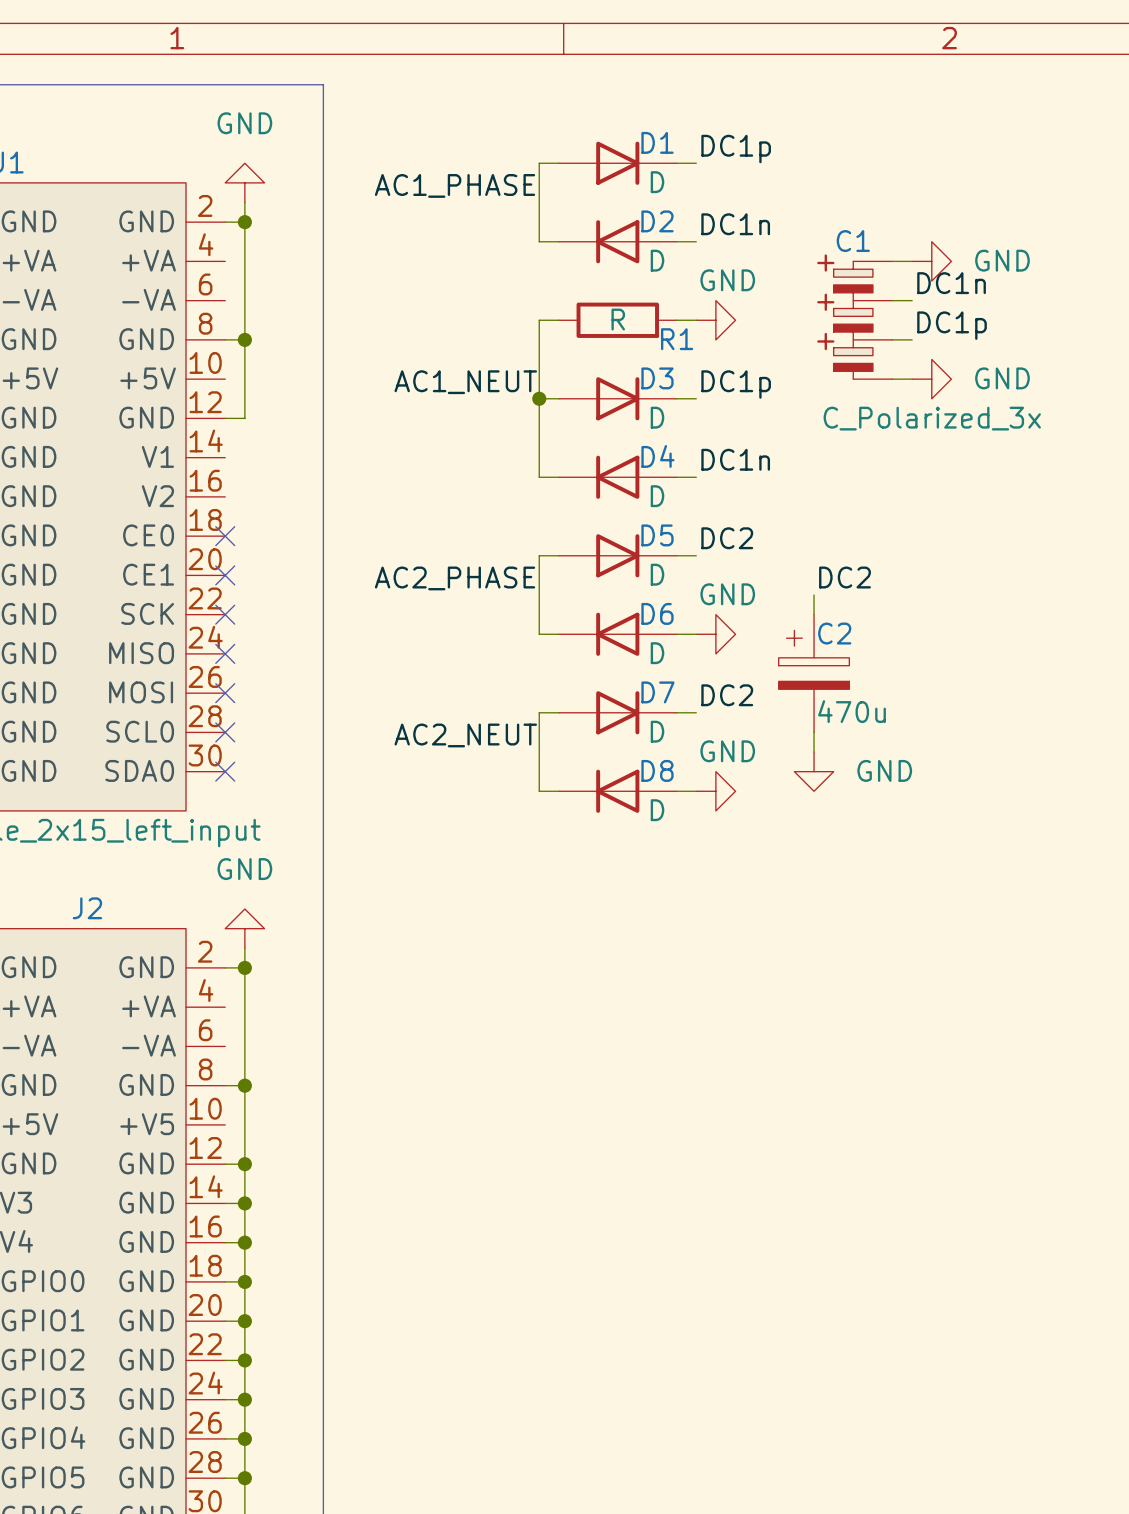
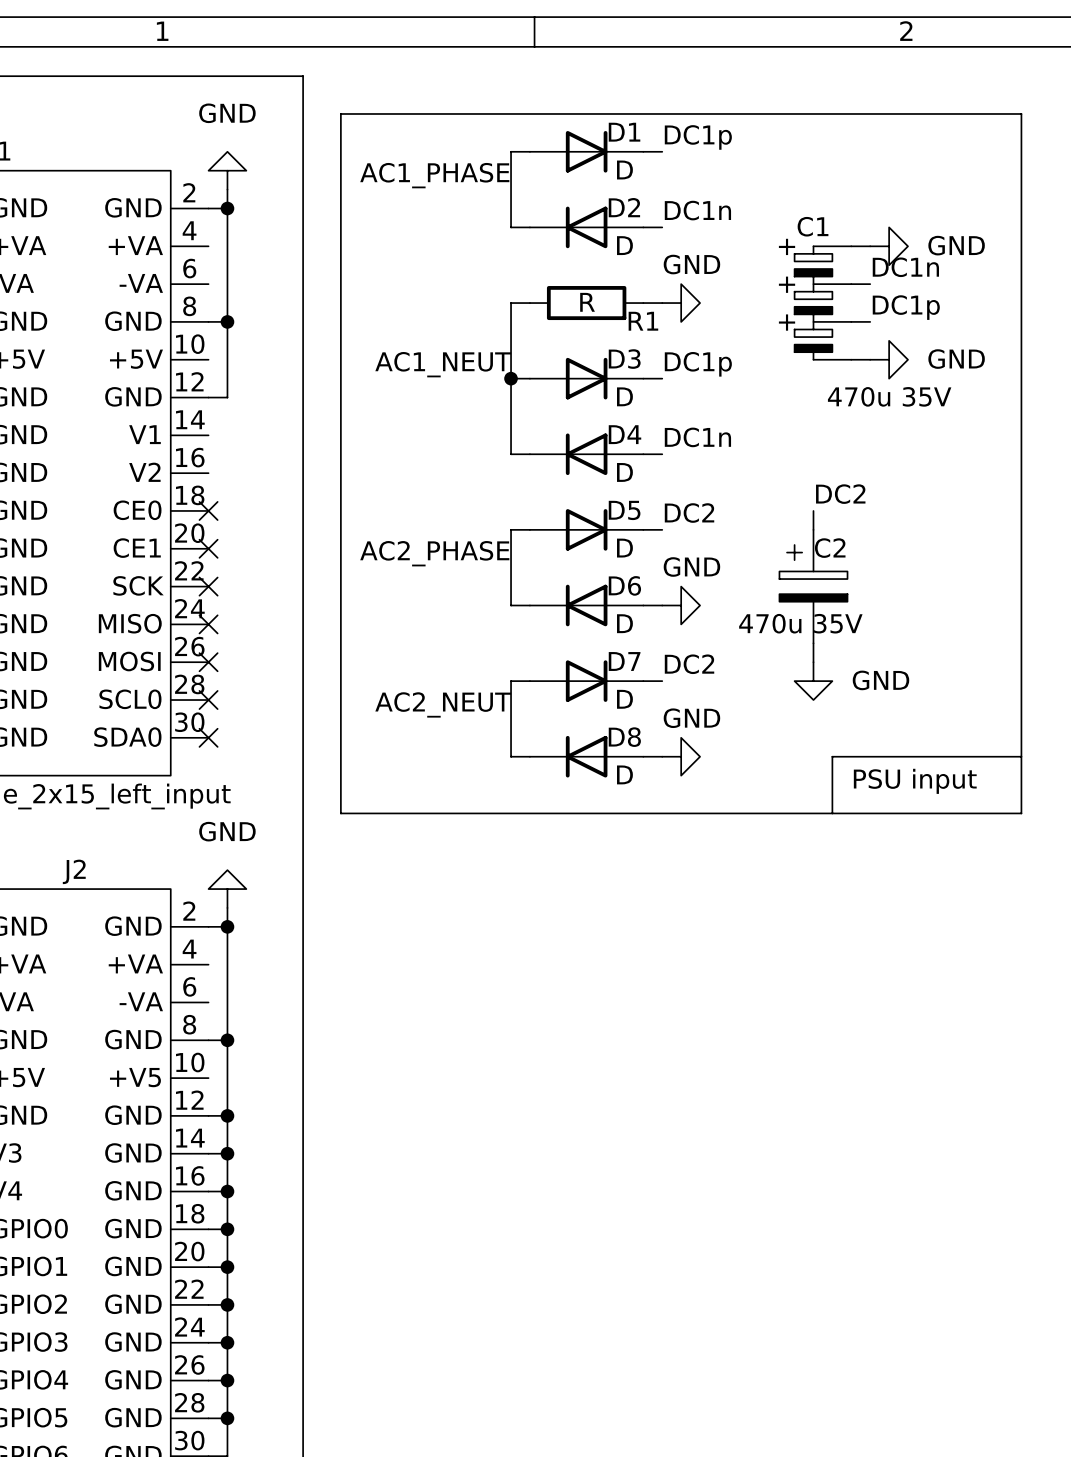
line: none -> (340, 113) (340, 813) (1021, 813) (1021, 113) (340, 113)
C1 value: C_Polarized_3x (932, 418) -> 470u 35V (889, 396)
label position: DC2 (845, 577) -> DC2 (840, 494)
wire: (814, 595) (814, 614) -> (813, 510) (813, 529)
C2 position: (814, 673) -> (813, 586)
C2 value: 470u (852, 711) -> 470u 35V (800, 623)
wire: (814, 732) (814, 752) -> (813, 643) (813, 662)
power symbol position: GND (814, 771) -> GND (813, 681)
line: none -> (1021, 756) (832, 756) (832, 813)
text: none -> PSU input (915, 781)

